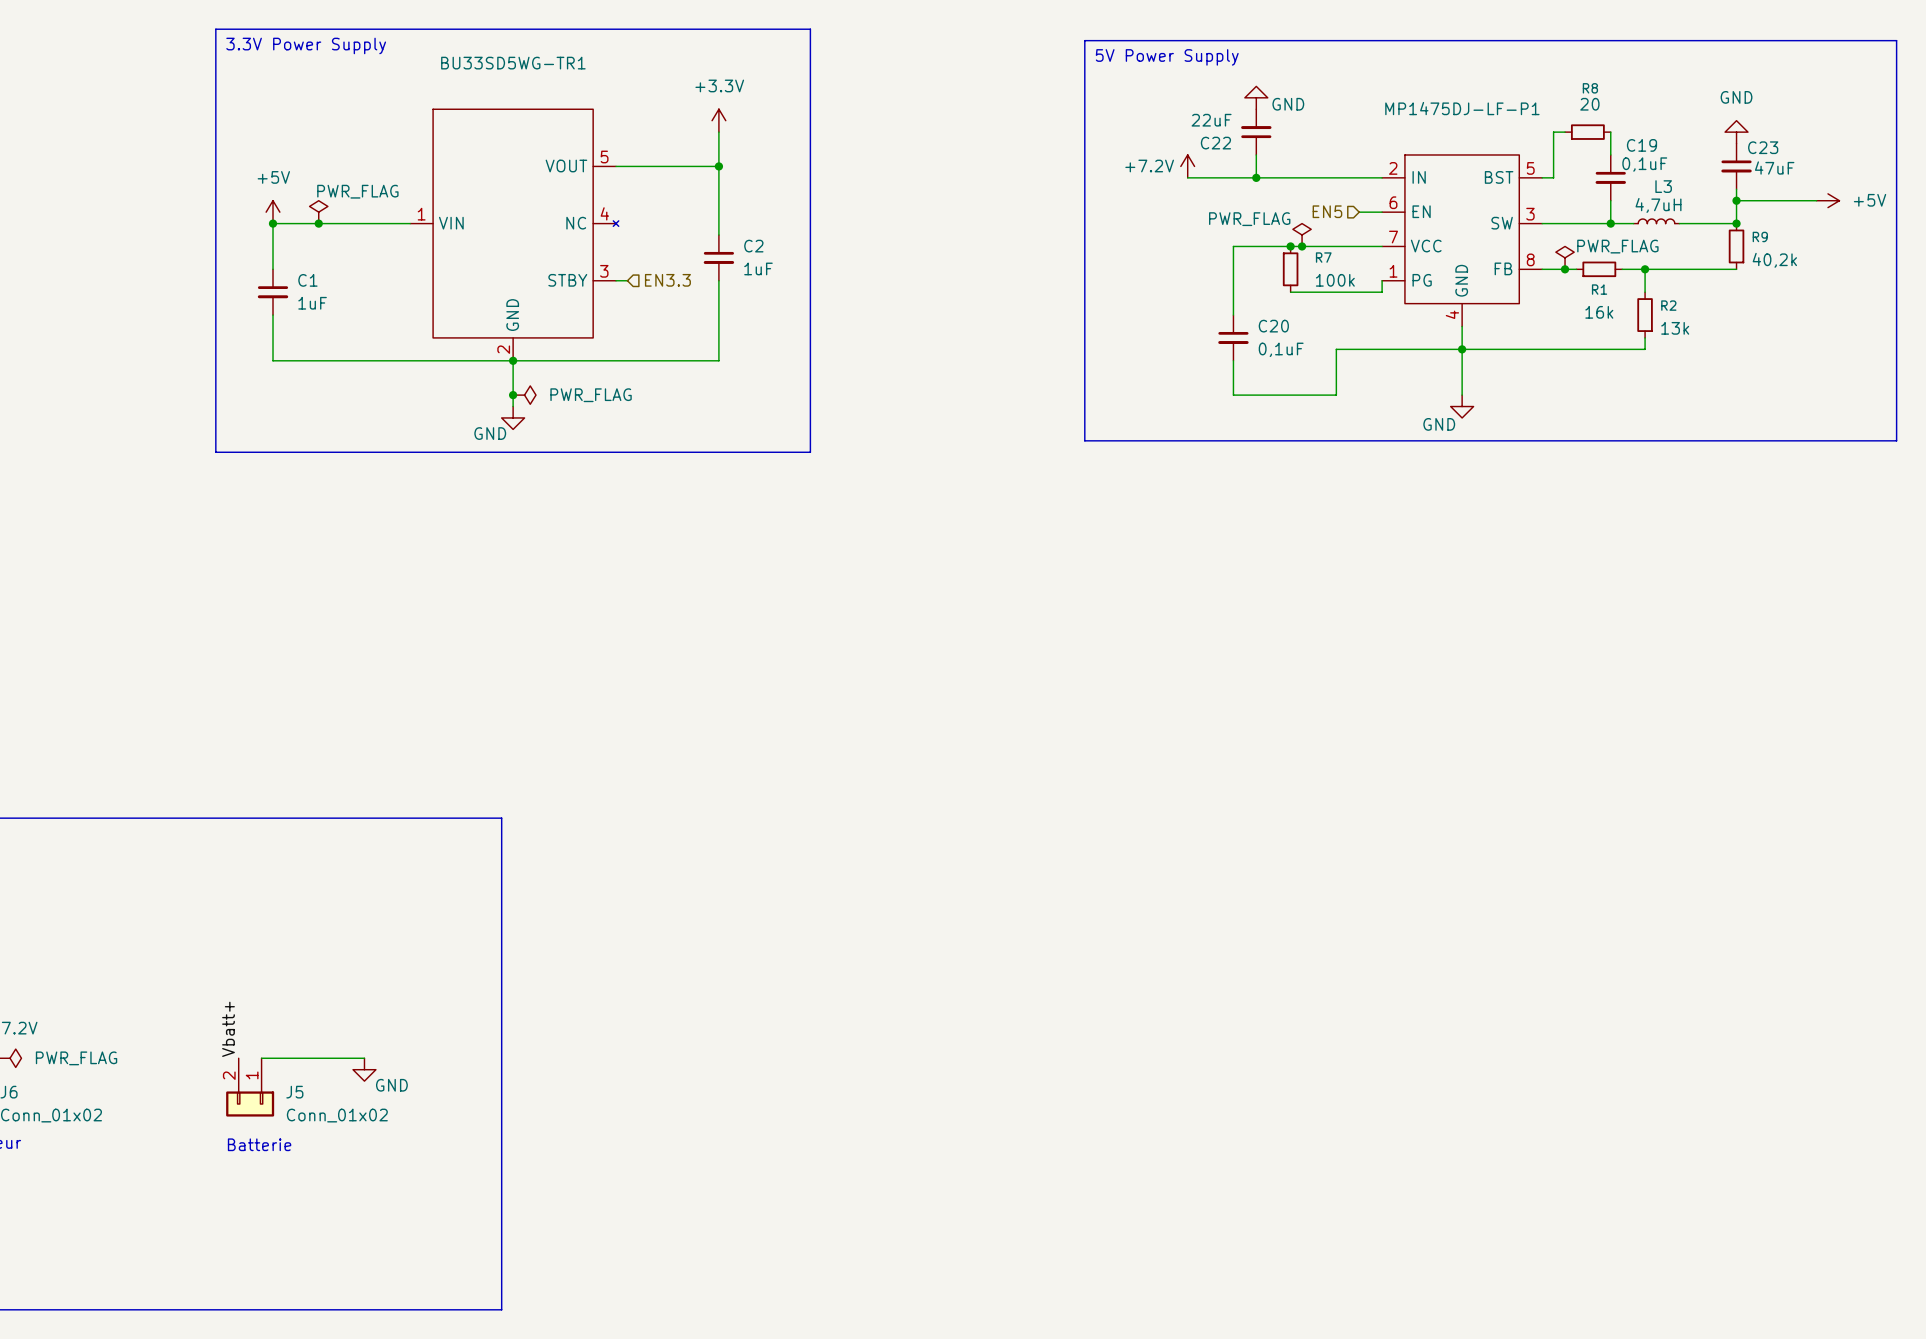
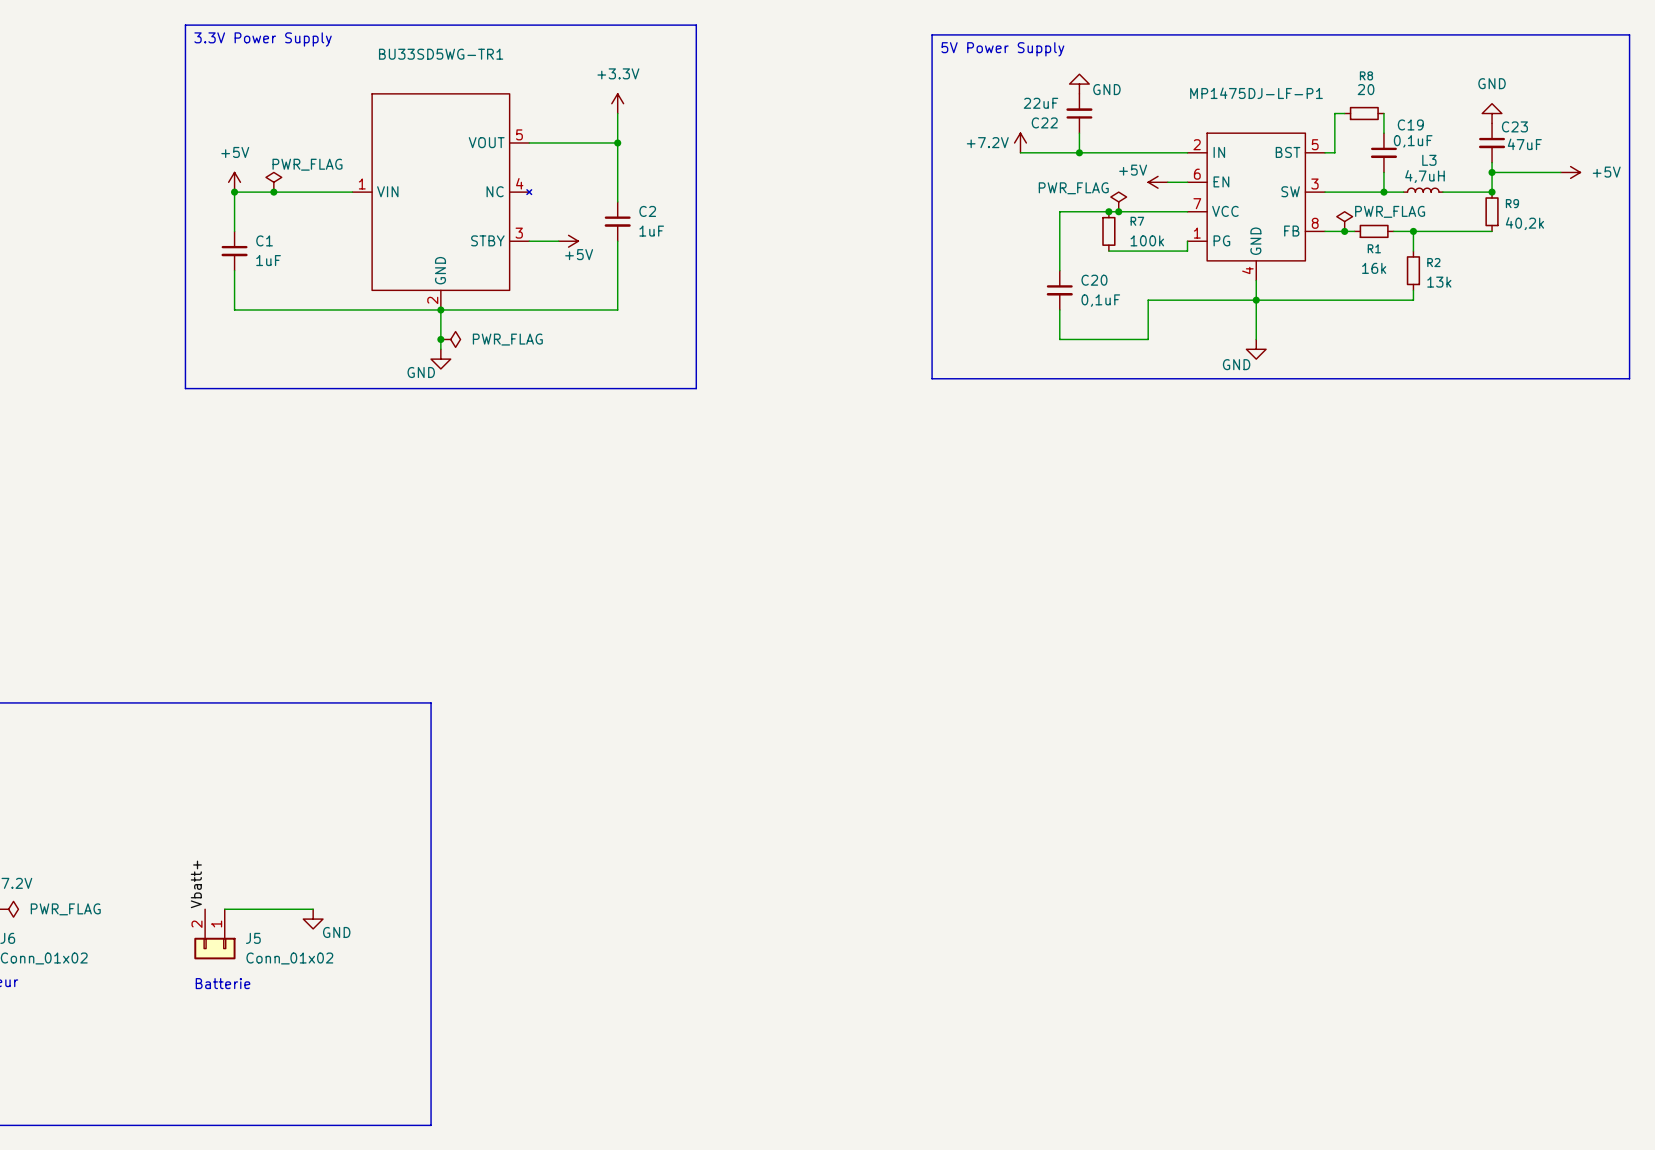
hierarchical label: EN5 (1327, 211) -> none
power symbol: none -> +5V (1158, 182)
wire: none -> (539, 241) (558, 241)
power symbol: none -> +5V (568, 241)
hierarchical label: EN3.3 (667, 280) -> none

